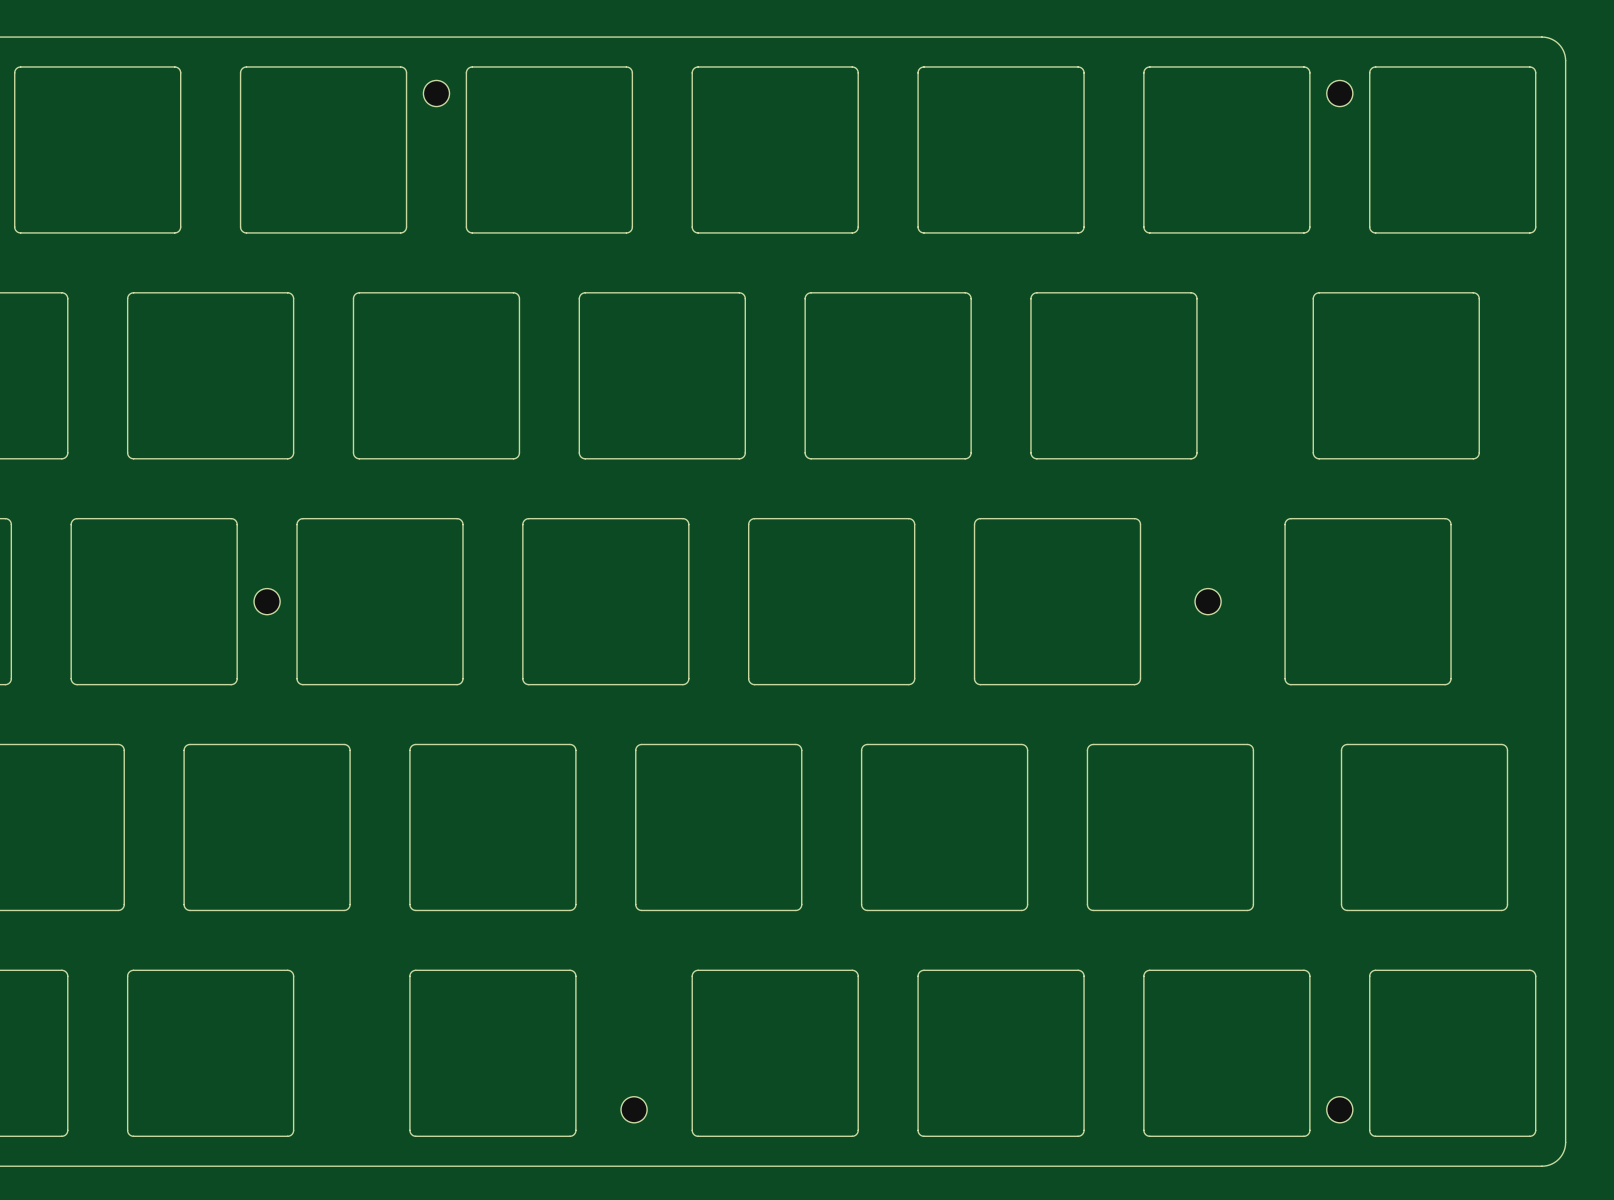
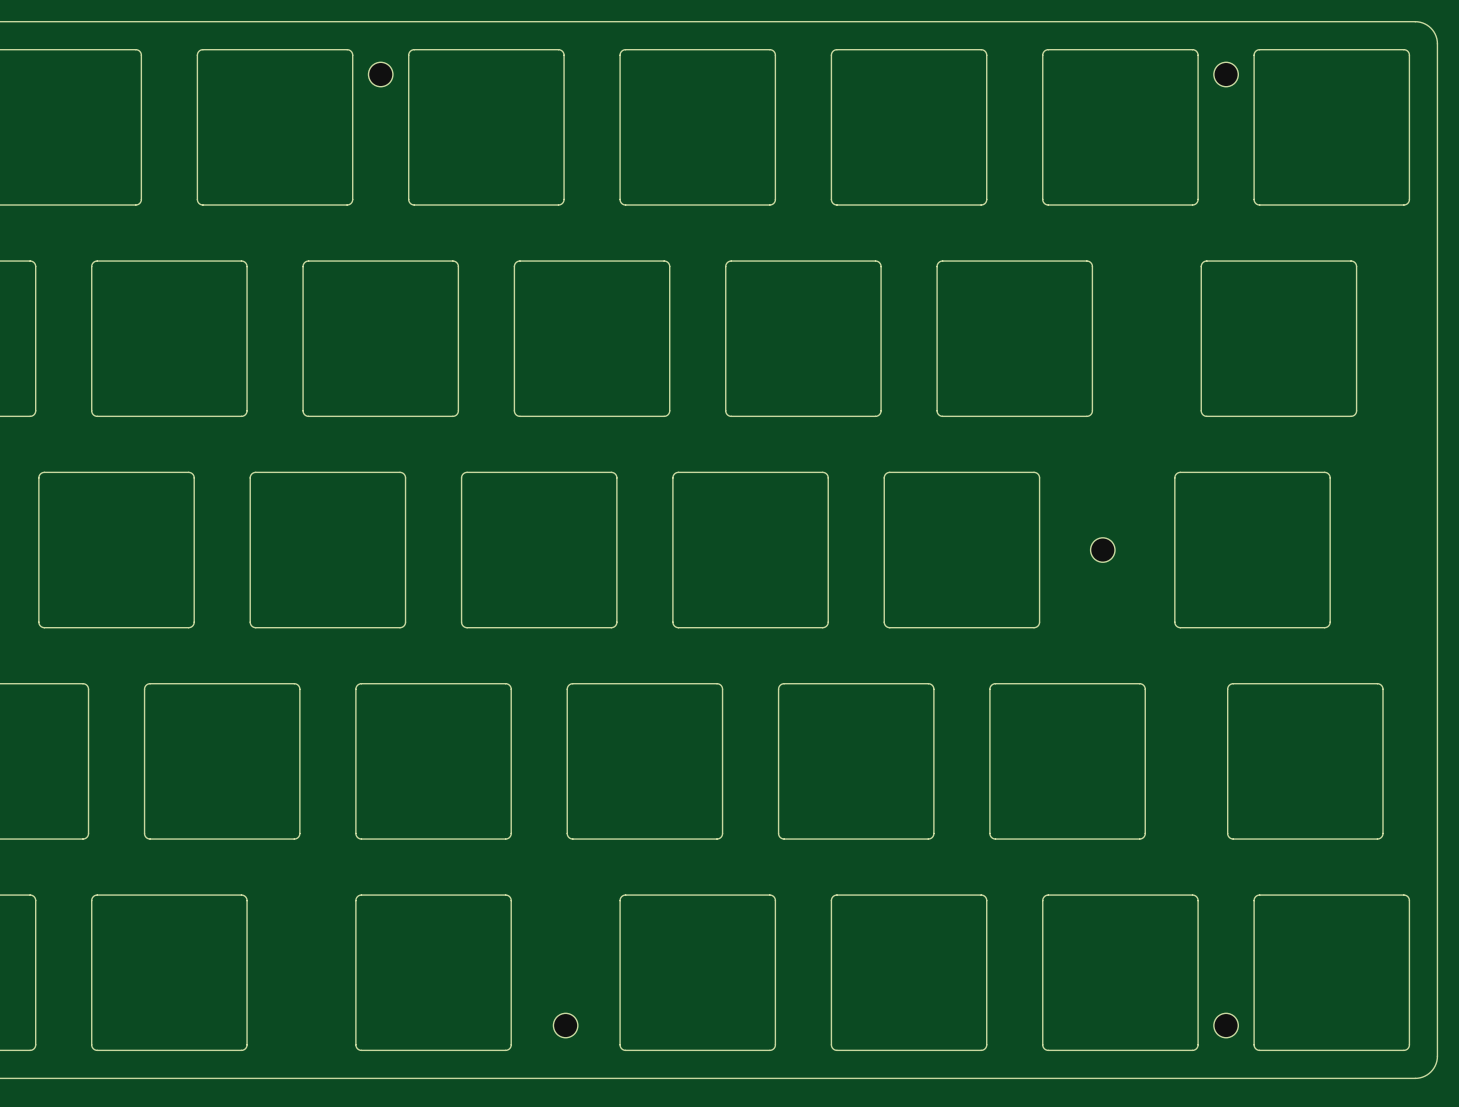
part: (267, 601) -> none

